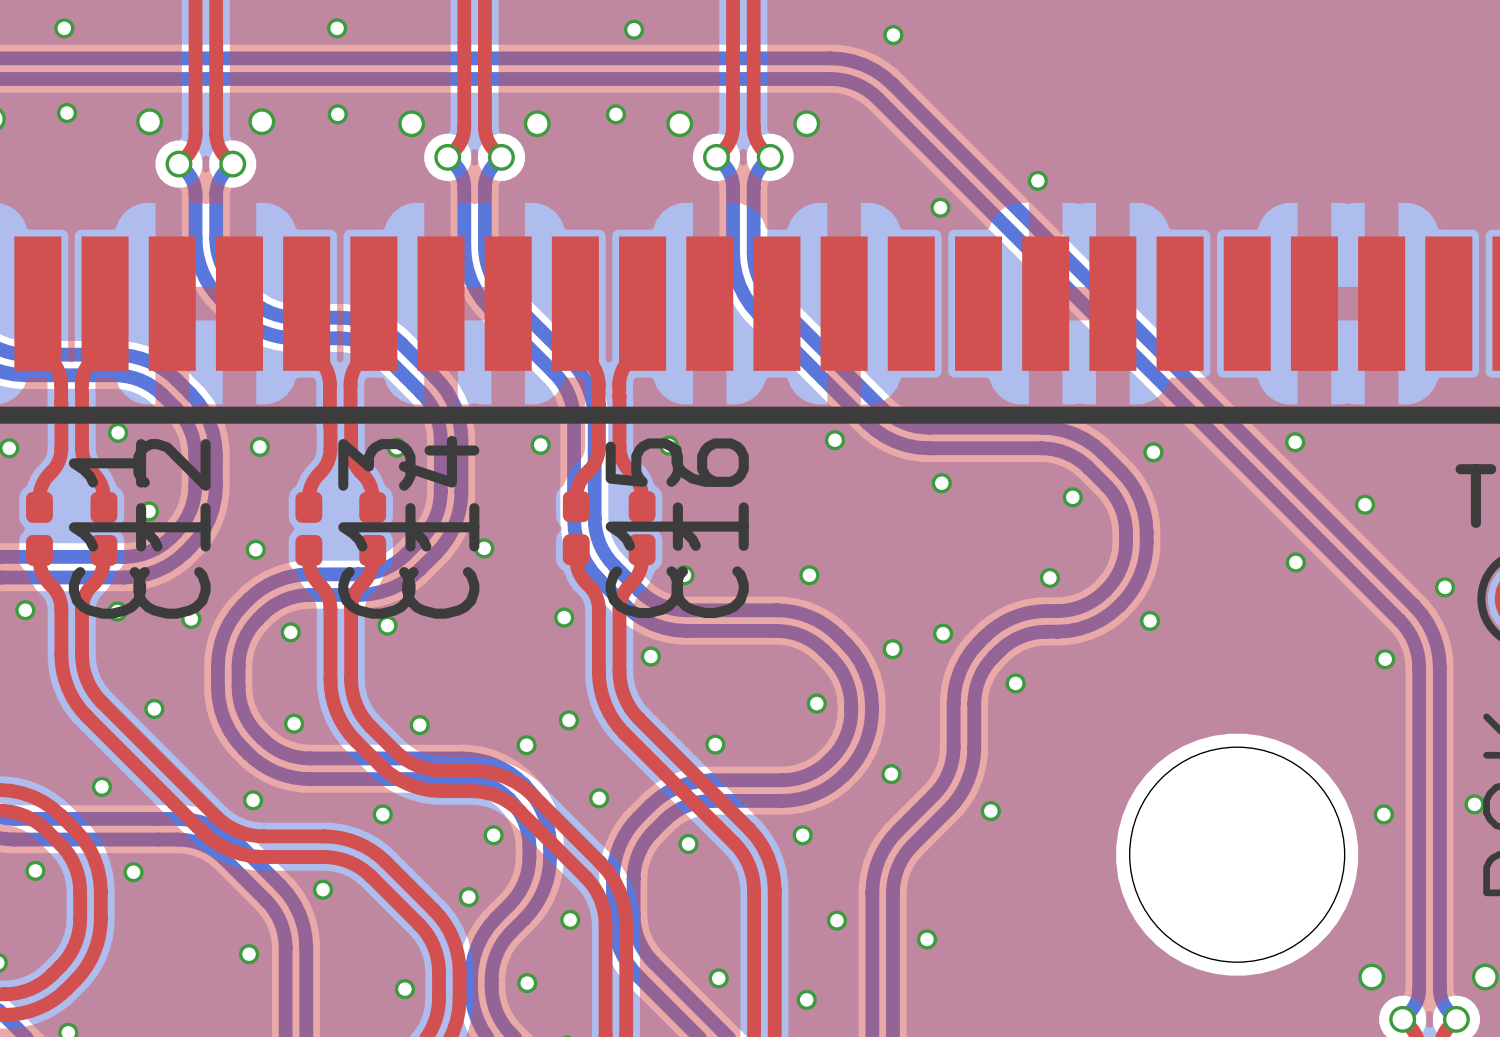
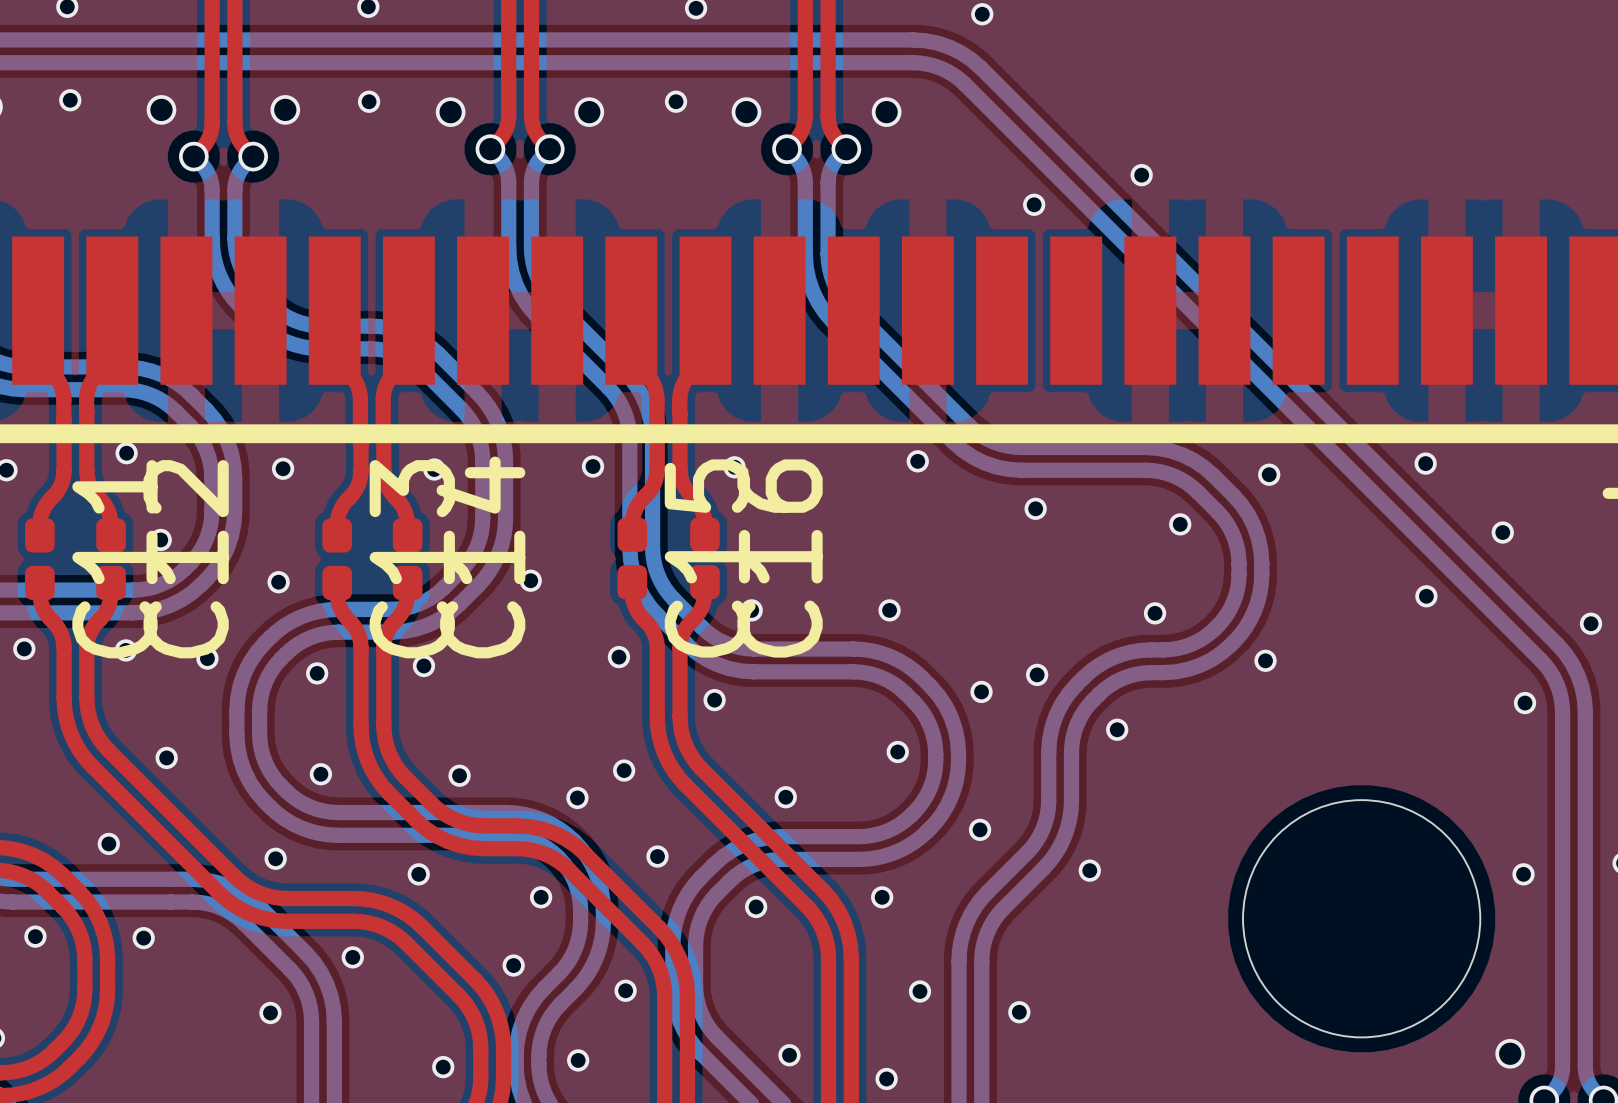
via position: (249, 954) -> (270, 1012)

